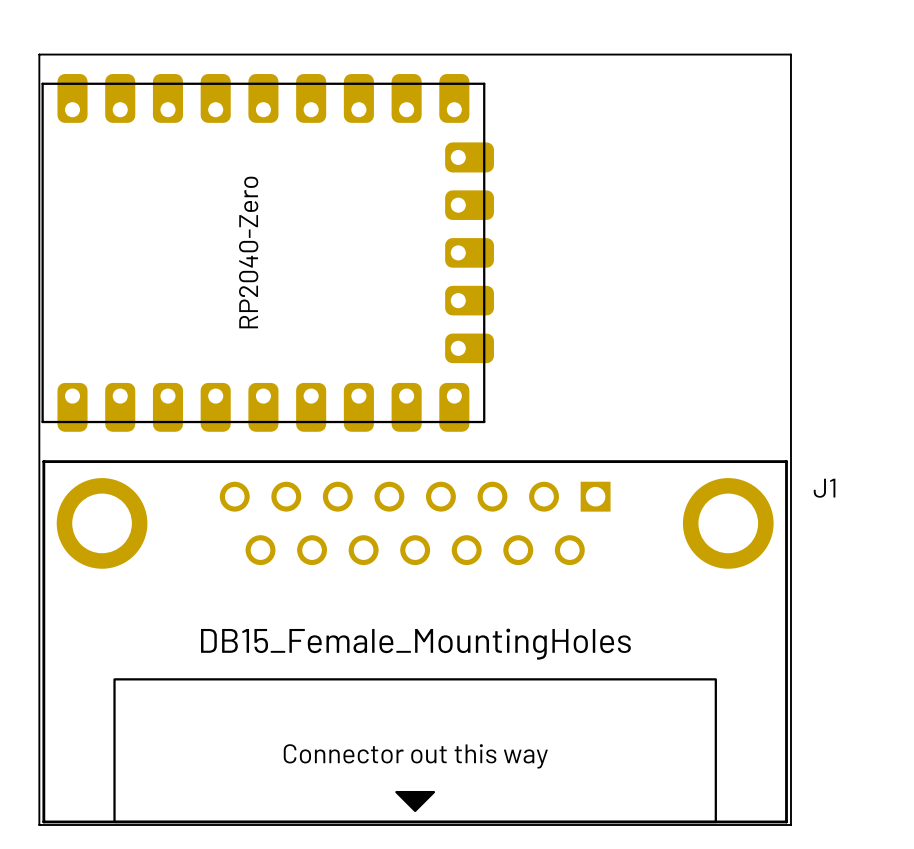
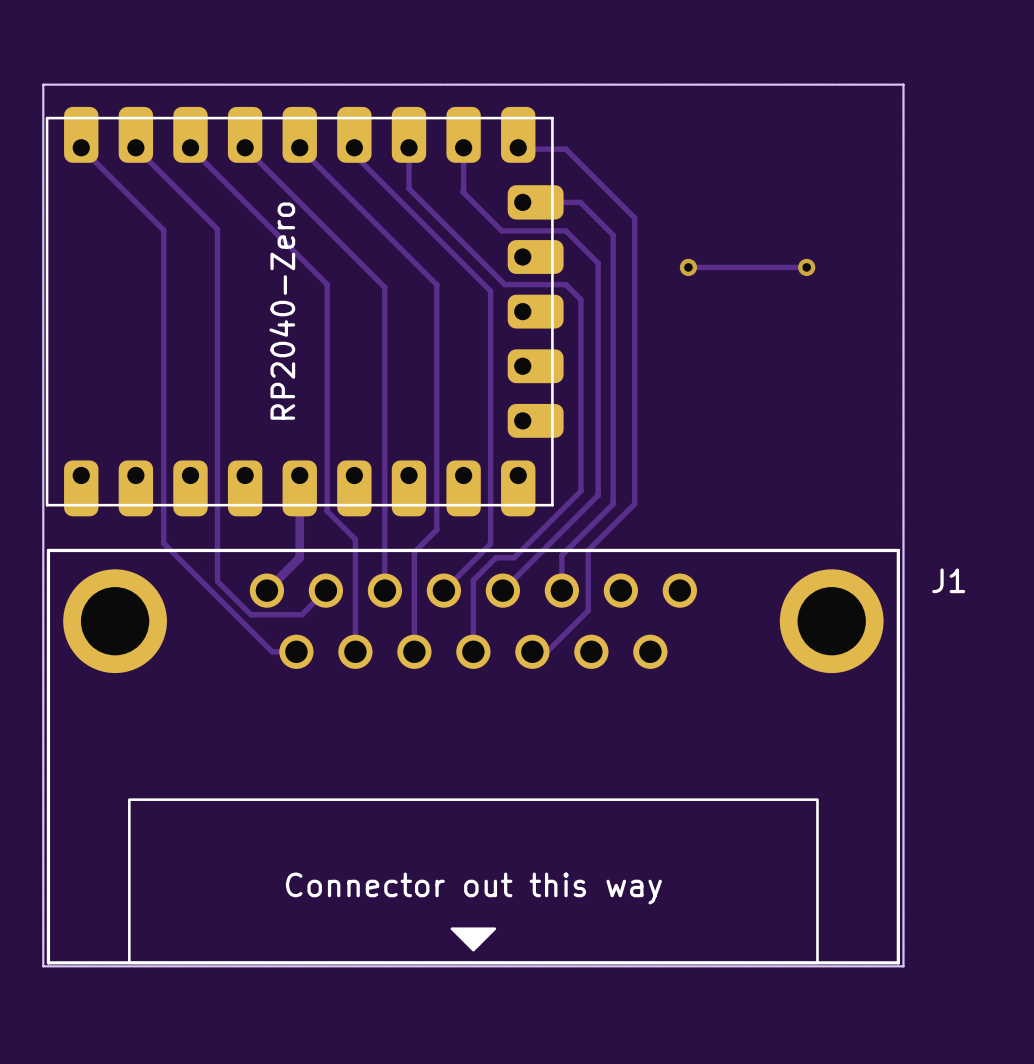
track: none -> (81, 147) (163, 230) (163, 543) (272, 651) (296, 651)
track: none -> (135, 147) (217, 229) (217, 581) (250, 614) (301, 614) (325, 590)
track: none -> (190, 147) (327, 284) (327, 511) (355, 539) (355, 651)
track: none -> (245, 147) (384, 287) (384, 590)
track: none -> (299, 147) (436, 284) (436, 529) (414, 552) (414, 651)
track: none -> (354, 147) (354, 154) (490, 291) (490, 543) (443, 590)
track: none -> (408, 147) (408, 188) (504, 284) (565, 284) (580, 299) (580, 491) (514, 557) (495, 557) (473, 580) (473, 651)
track: none -> (463, 147) (463, 192) (501, 230) (565, 230) (598, 263) (598, 495) (502, 590)
track: none -> (518, 147) (565, 149) (634, 217) (634, 503) (588, 550) (588, 610) (547, 651) (532, 651)
track: none -> (522, 202) (580, 202) (613, 235) (613, 503) (561, 555) (561, 590)
track: none -> (688, 267) (806, 267)
via: none -> (688, 267)
via: none -> (806, 267)
track: none -> (299, 475) (299, 557) (266, 590)
J1 footprint: [42, 460, 788, 824] -> [46, 548, 900, 965]
J1 value: DB15_Female_MountingHoles (415, 644) -> none

